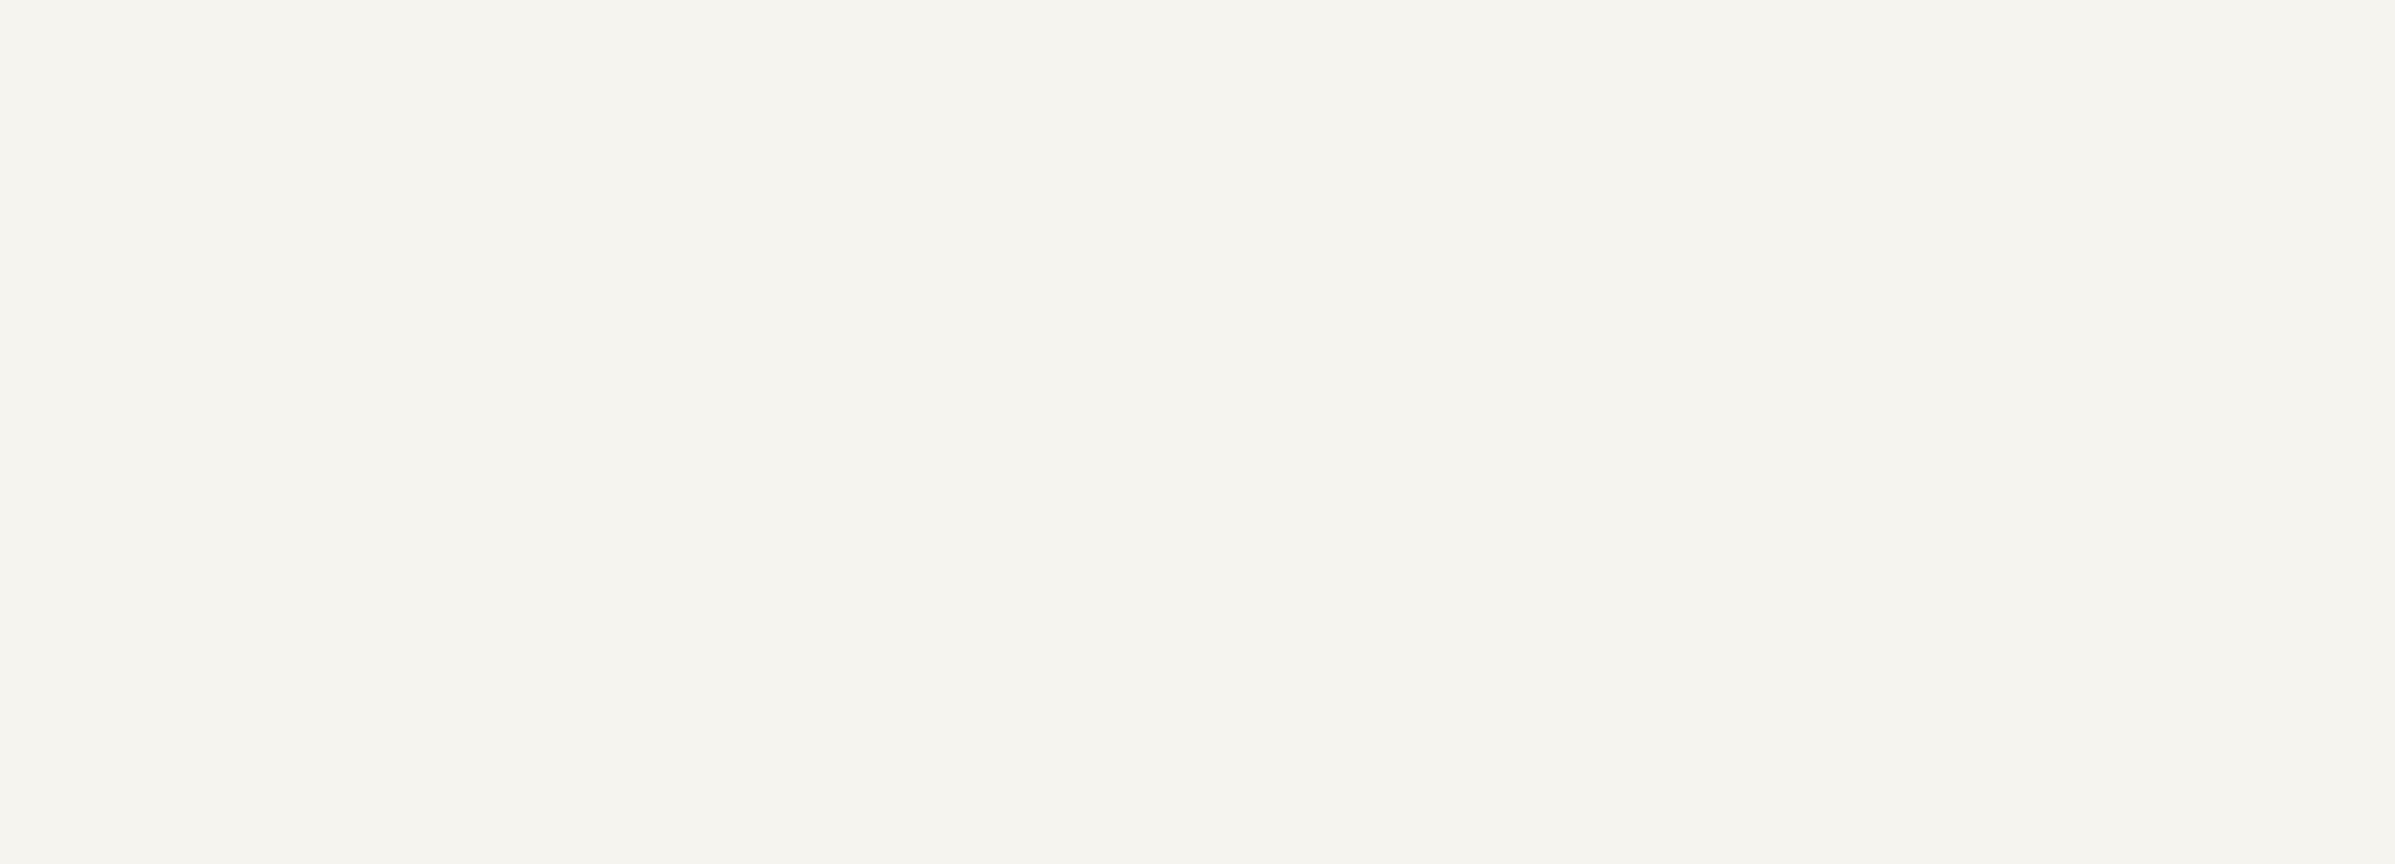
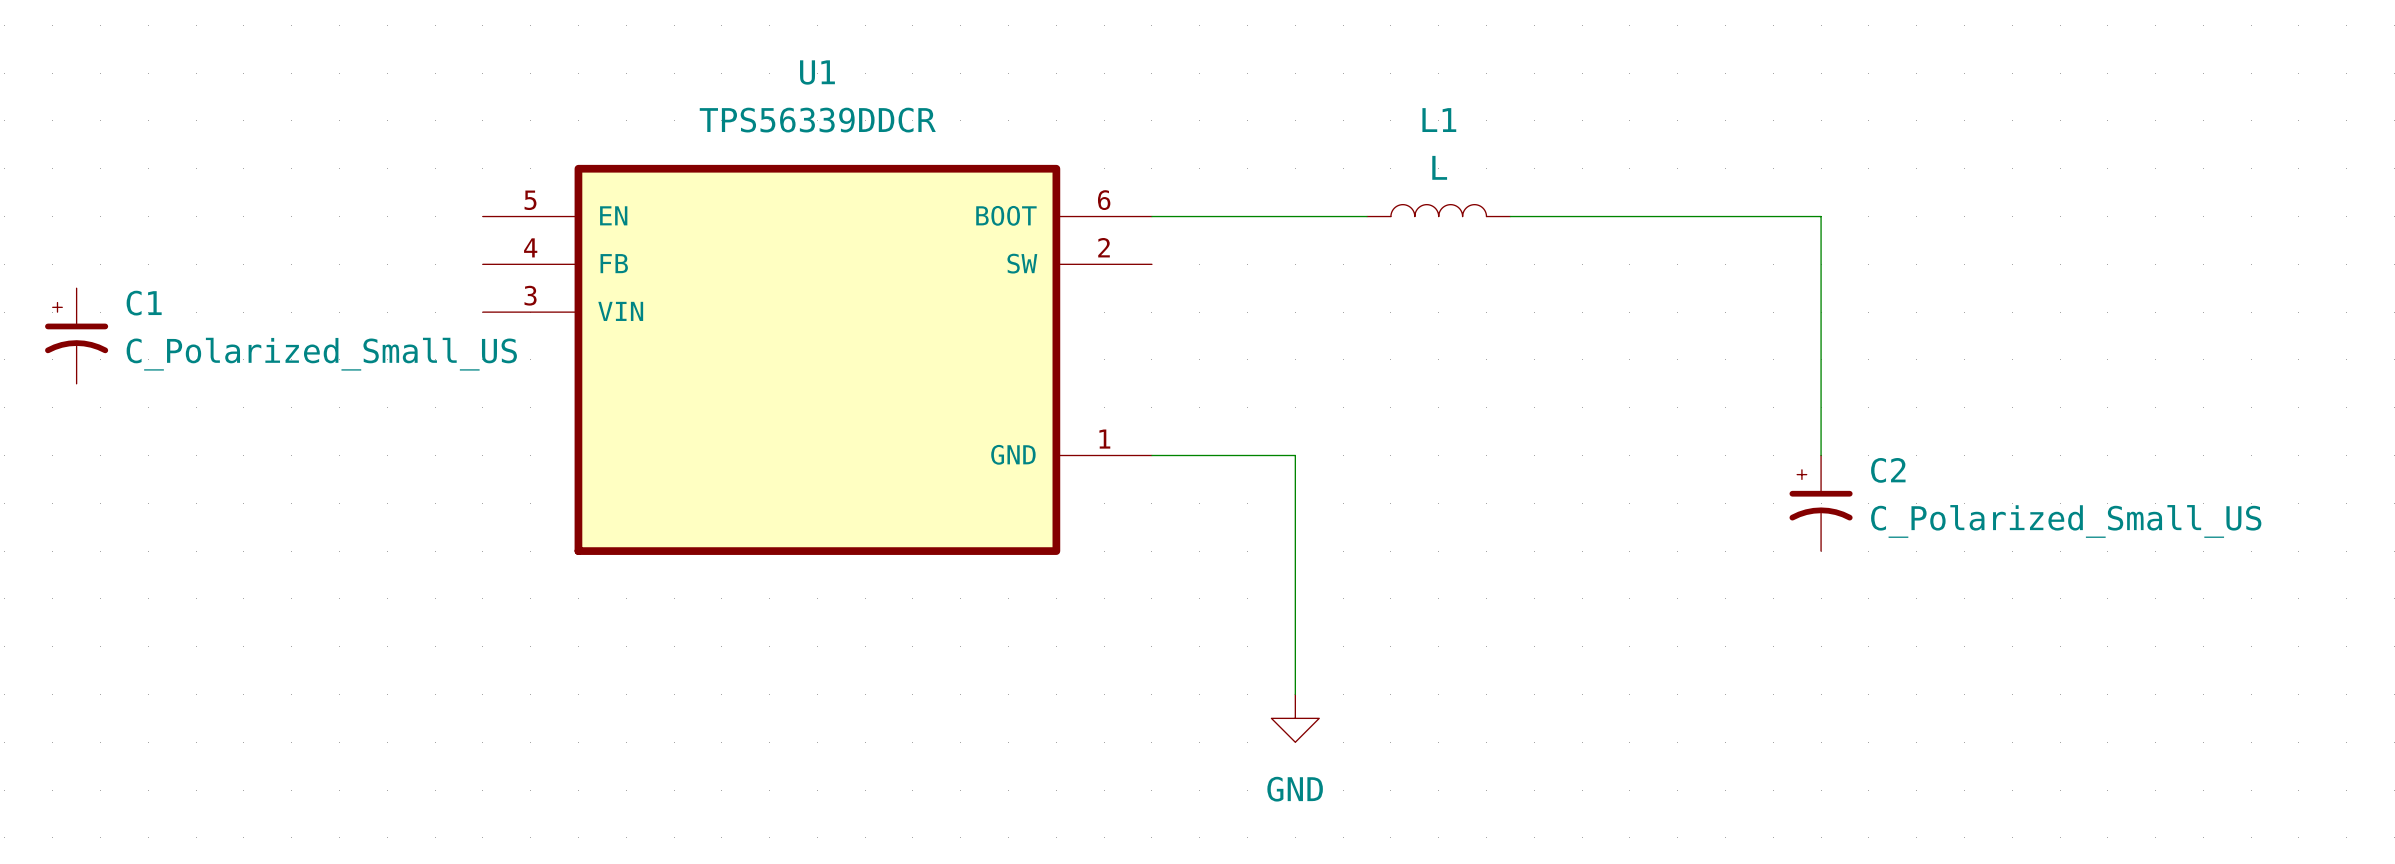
L1: none -> L (1438, 210)
wire: none -> (1151, 216) (1367, 216)
wire: none -> (1510, 216) (1821, 216) (1821, 455)
C1: none -> C_Polarized_Small_US (76, 336)
U1: none -> TPS56339DDCR (817, 359)
wire: none -> (1151, 455) (1295, 455) (1295, 694)
C2: none -> C_Polarized_Small_US (1821, 503)
power symbol: none -> GND (1295, 718)

